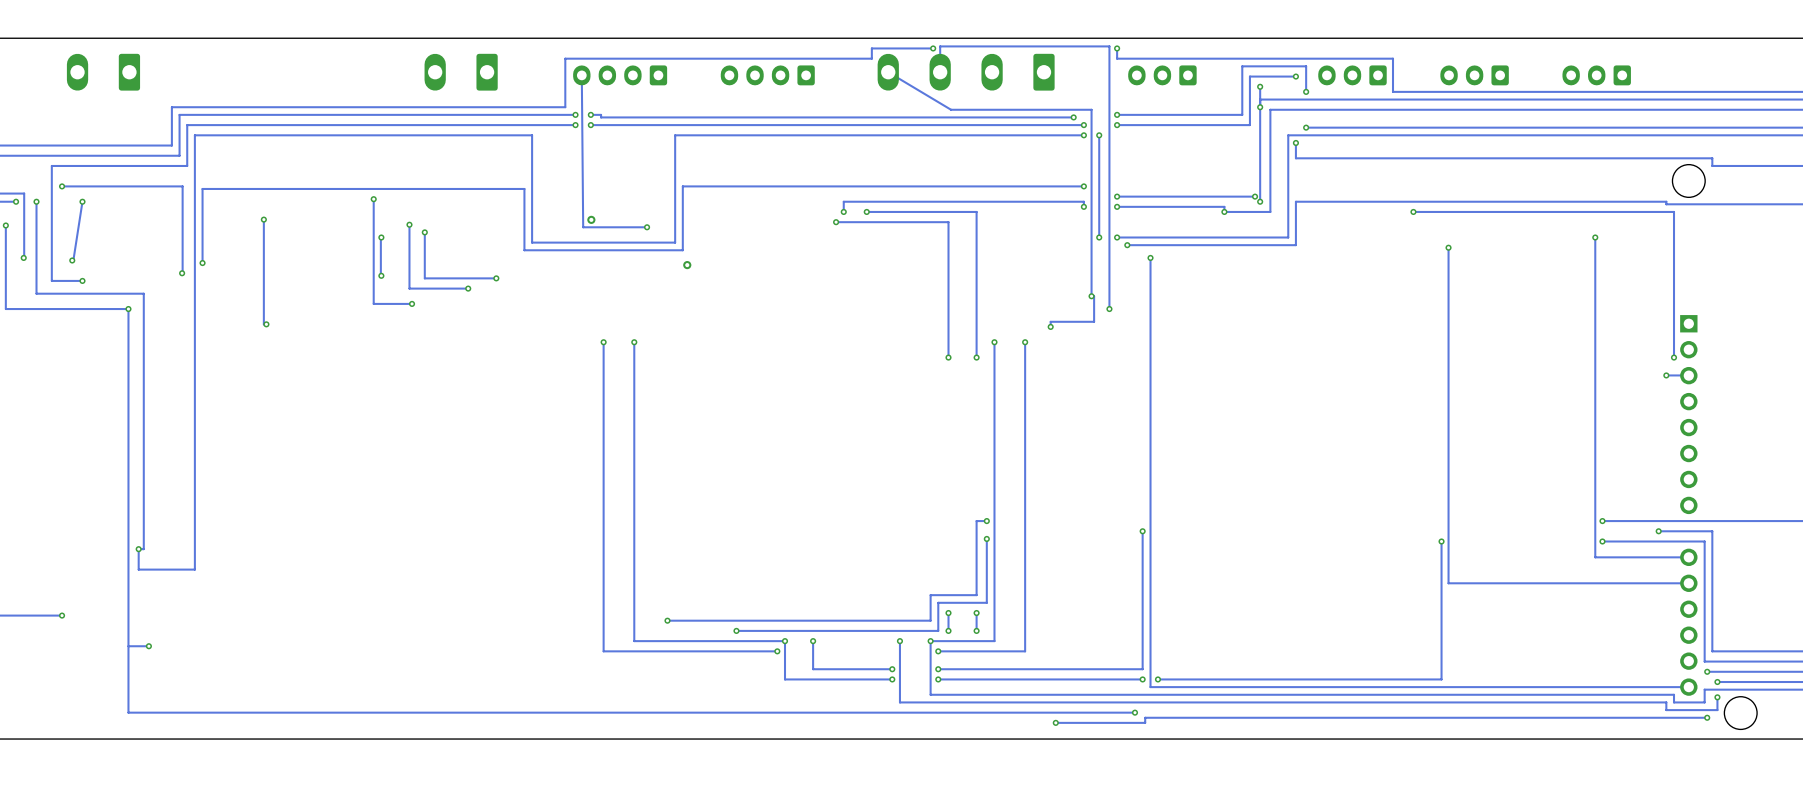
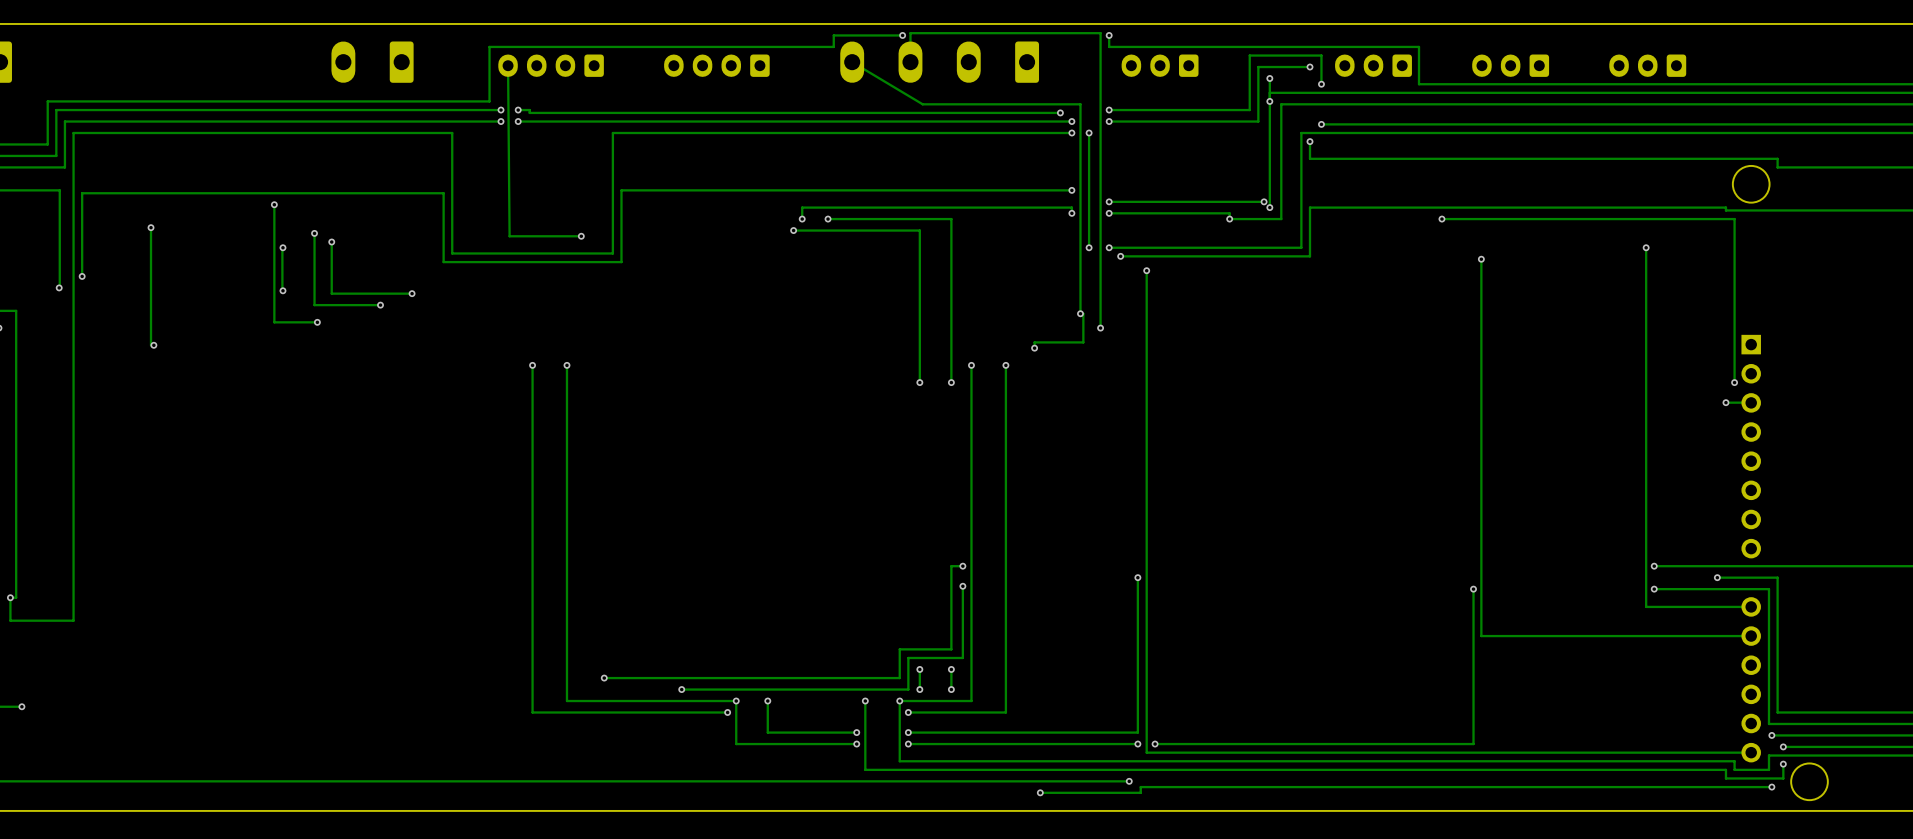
via: (591, 219) -> none
via: (687, 265) -> none

